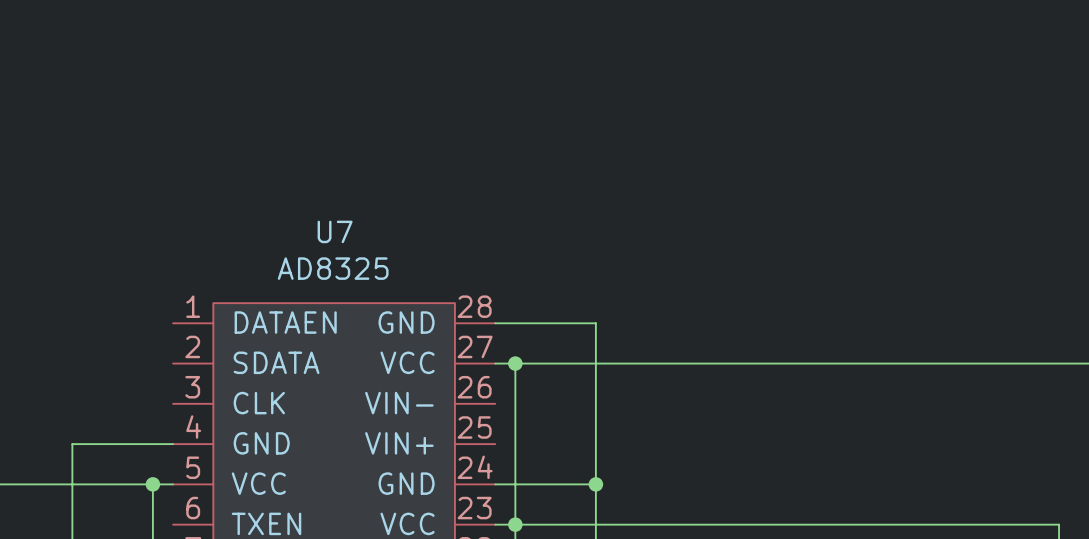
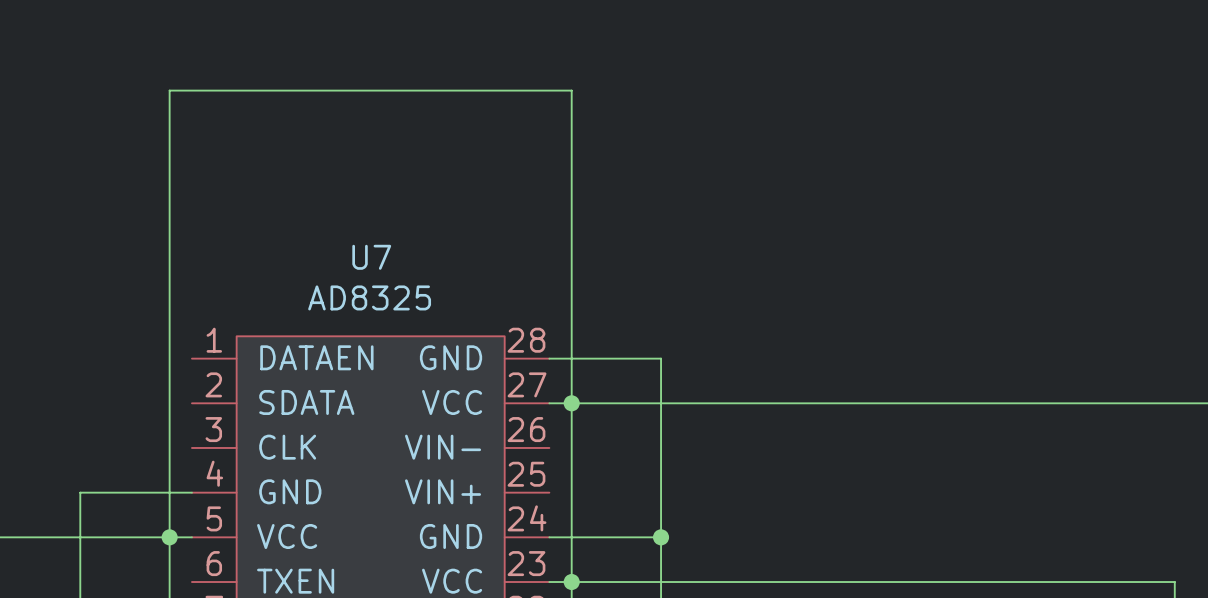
wire: none -> (571, 403) (571, 90) (169, 90) (169, 537)

